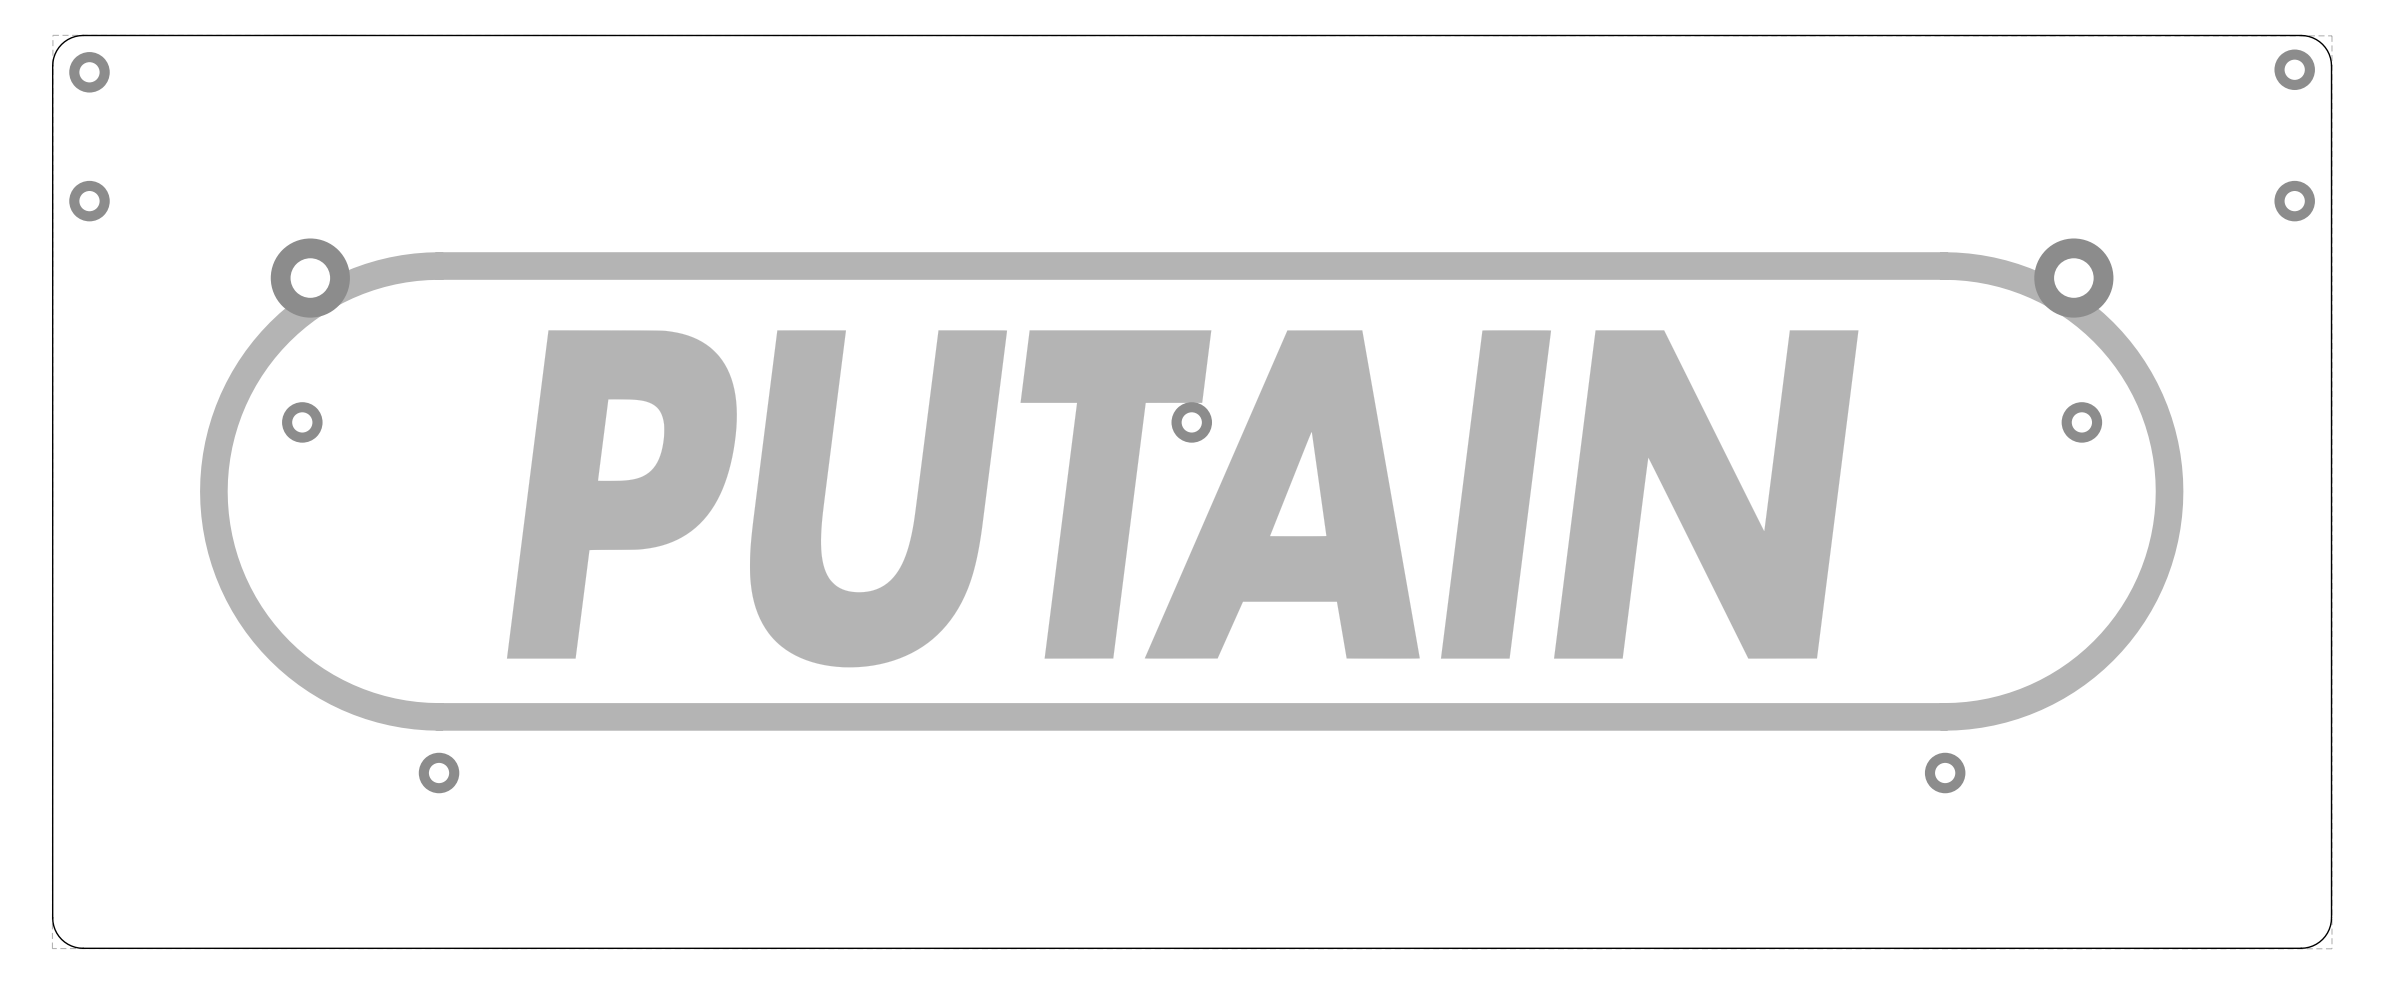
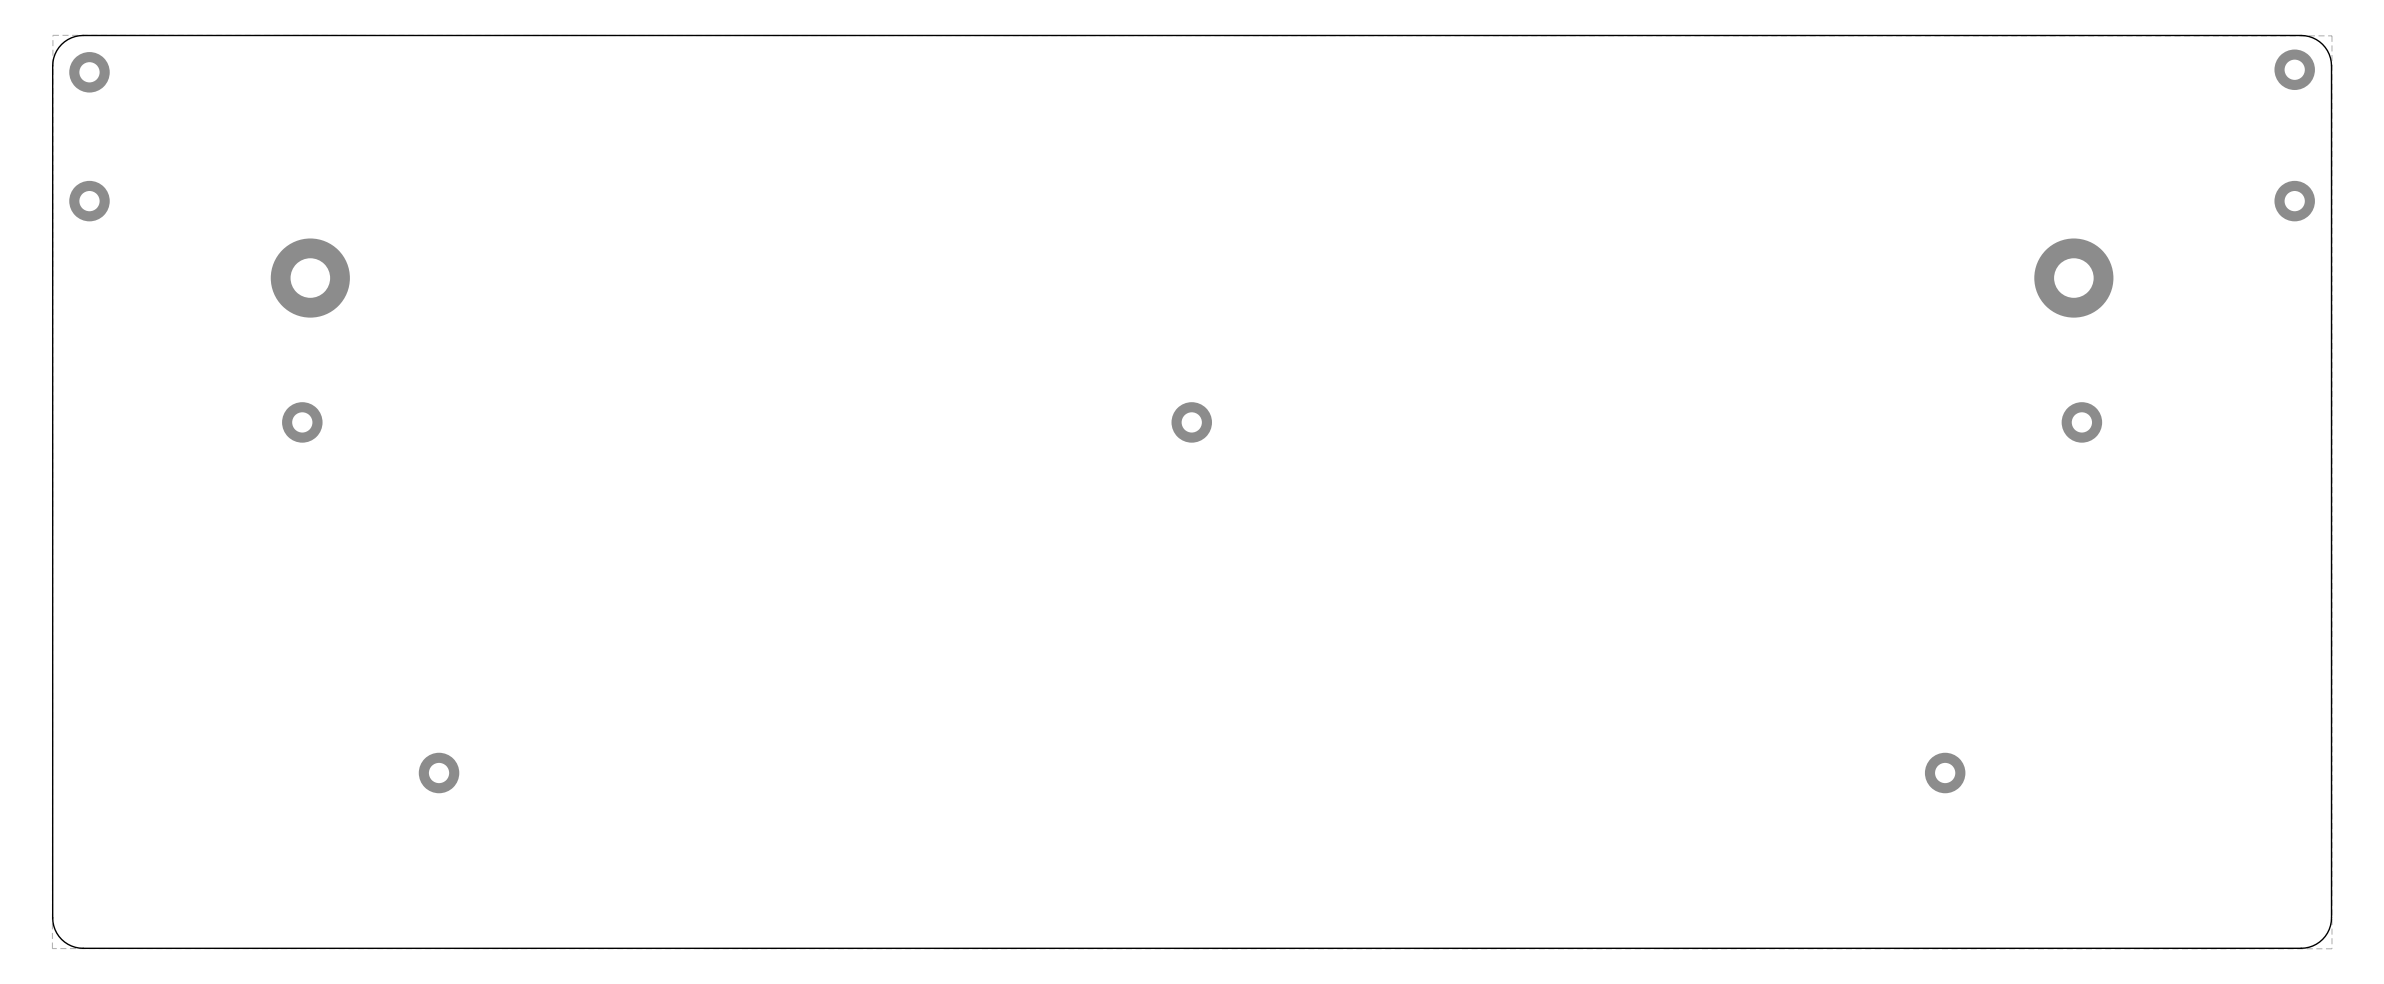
drawing: [200, 252, 2184, 731] -> none

